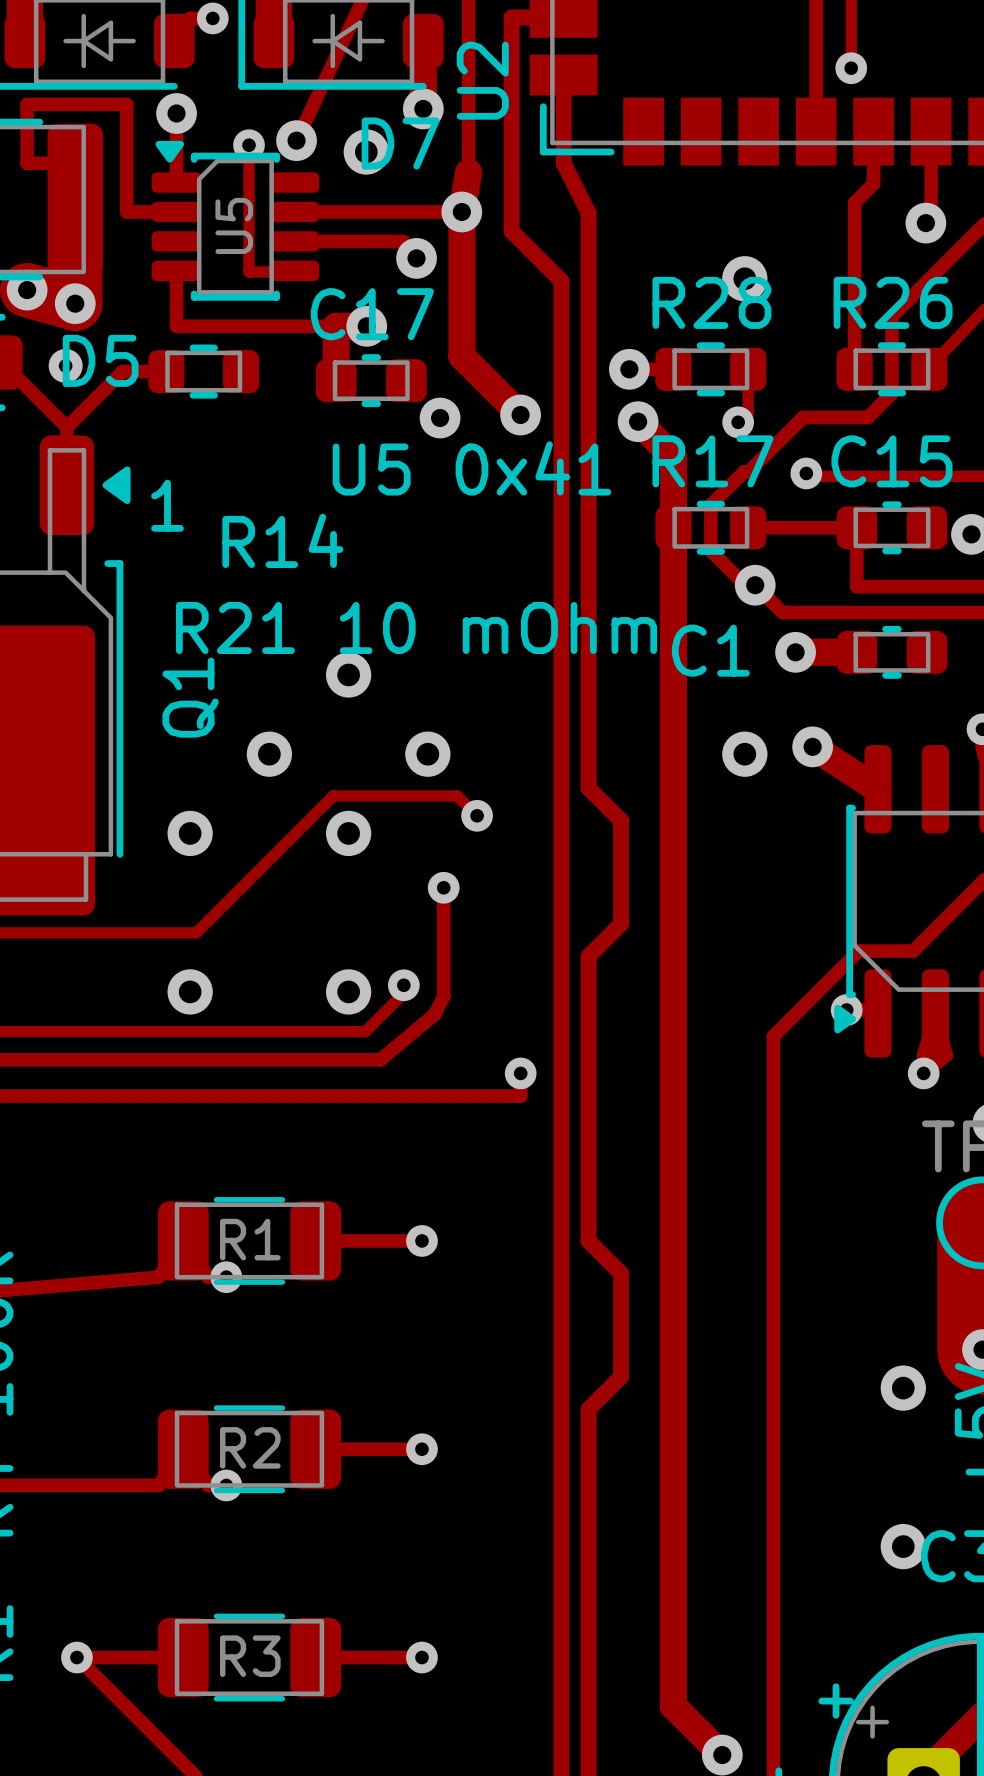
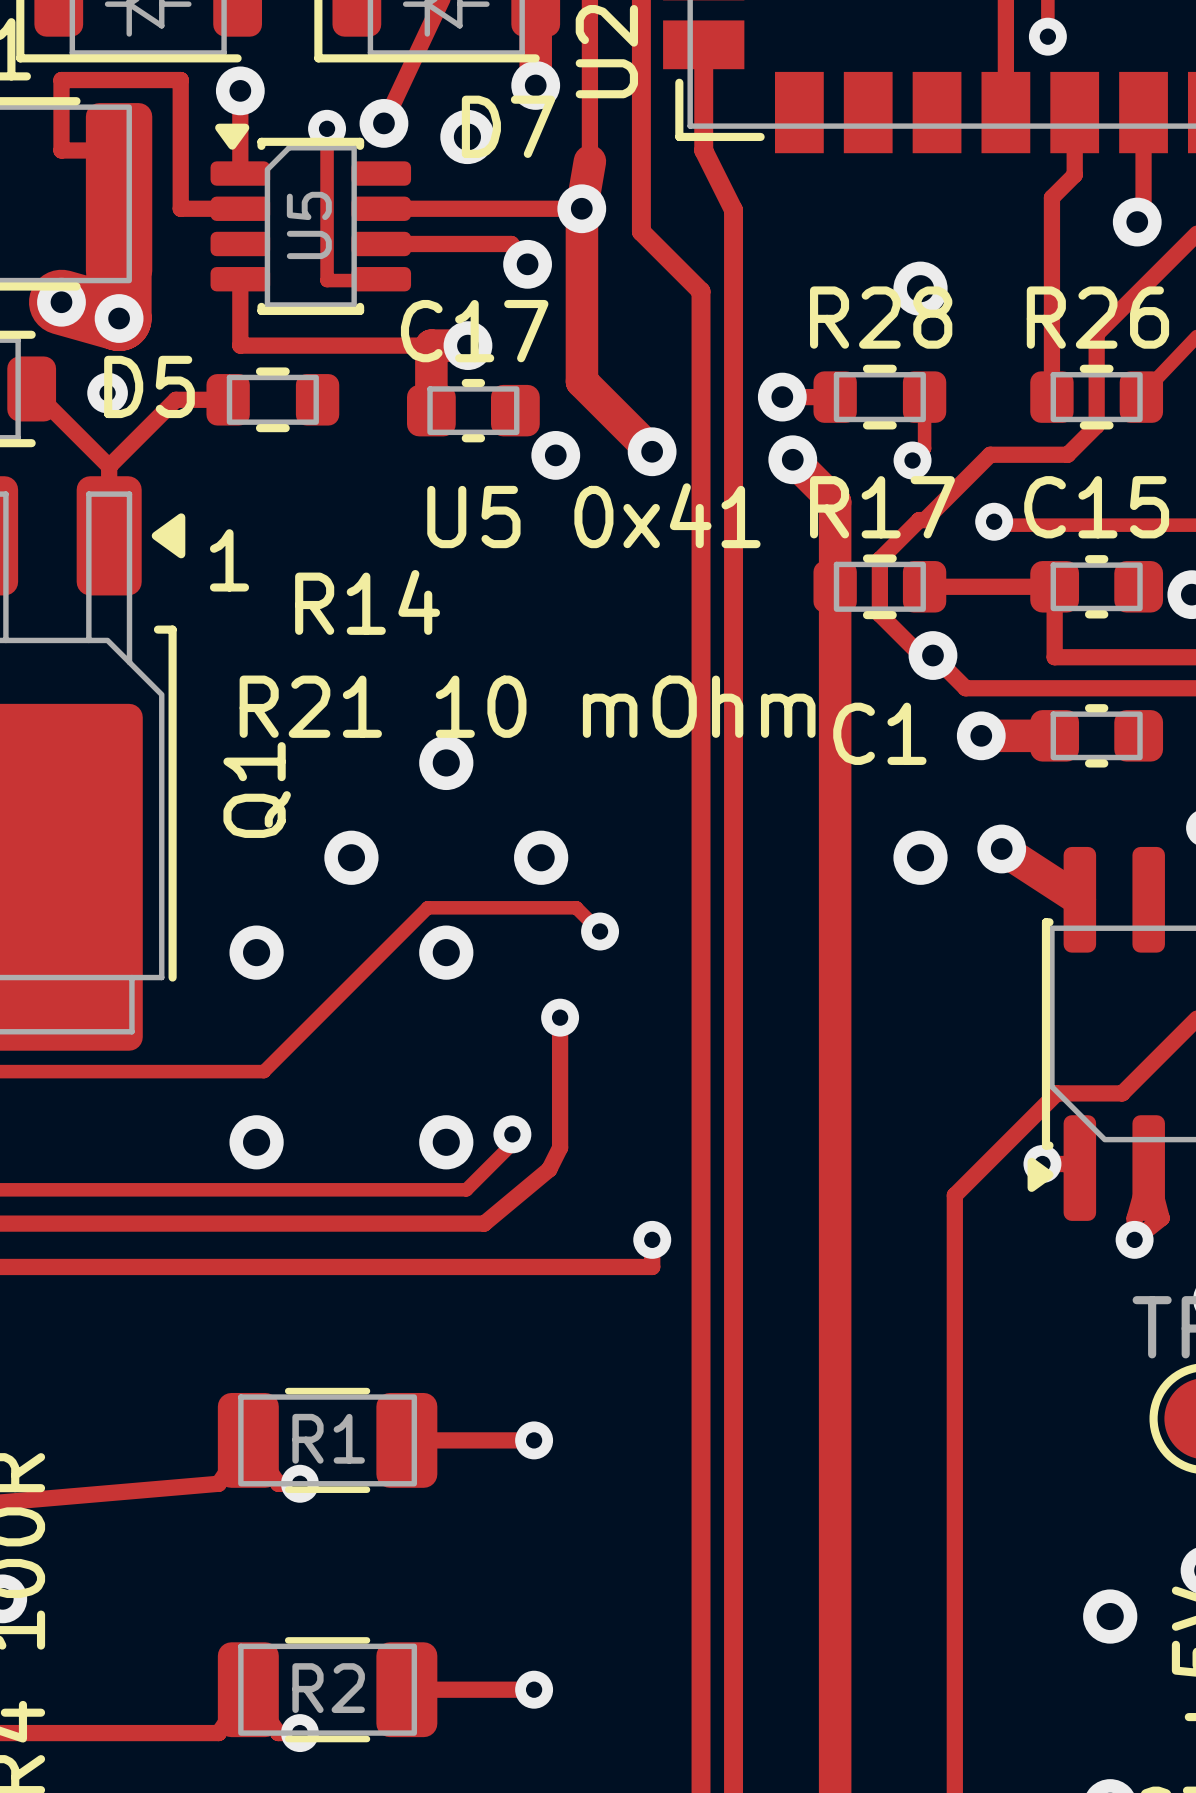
track: (588, 788) (621, 820) (621, 924) (588, 956) -> (733, 898) (733, 1099)
track: (588, 1240) (621, 1273) (621, 1376) (588, 1409) -> (733, 1440) (733, 1641)

